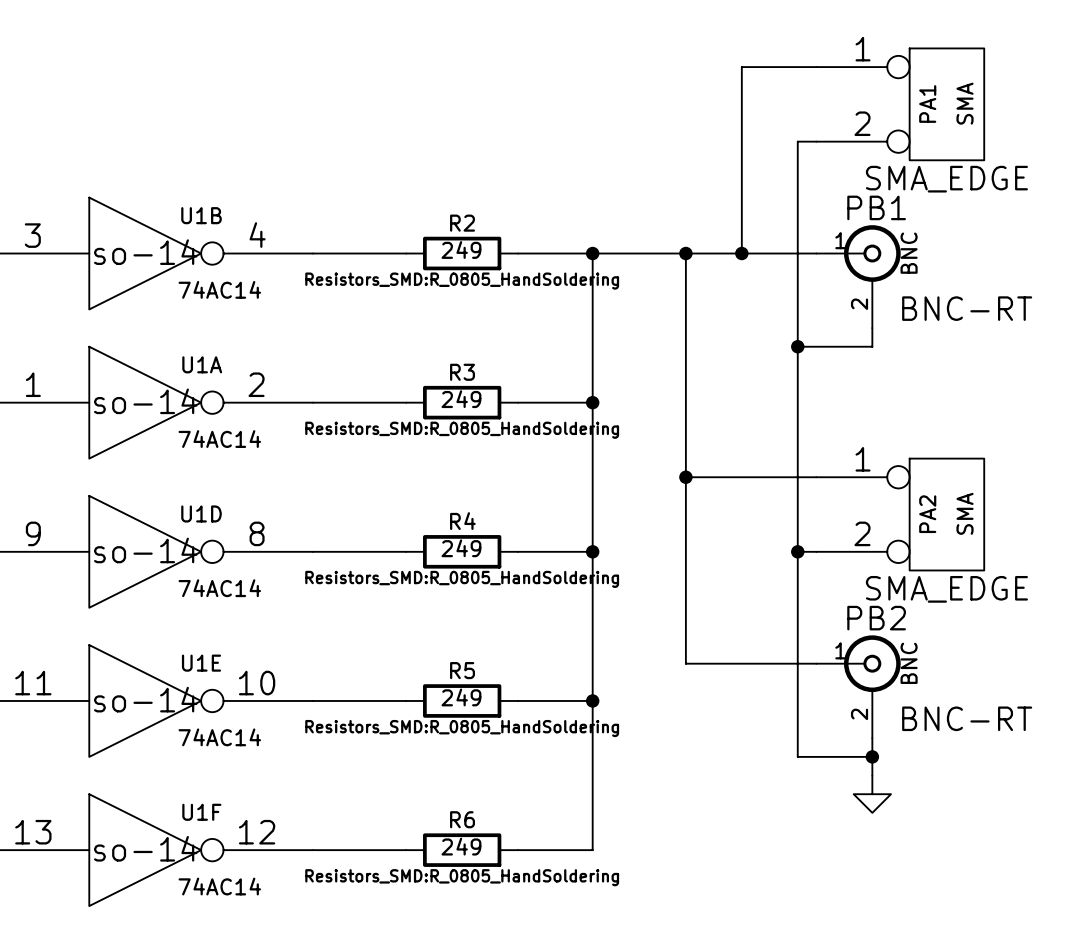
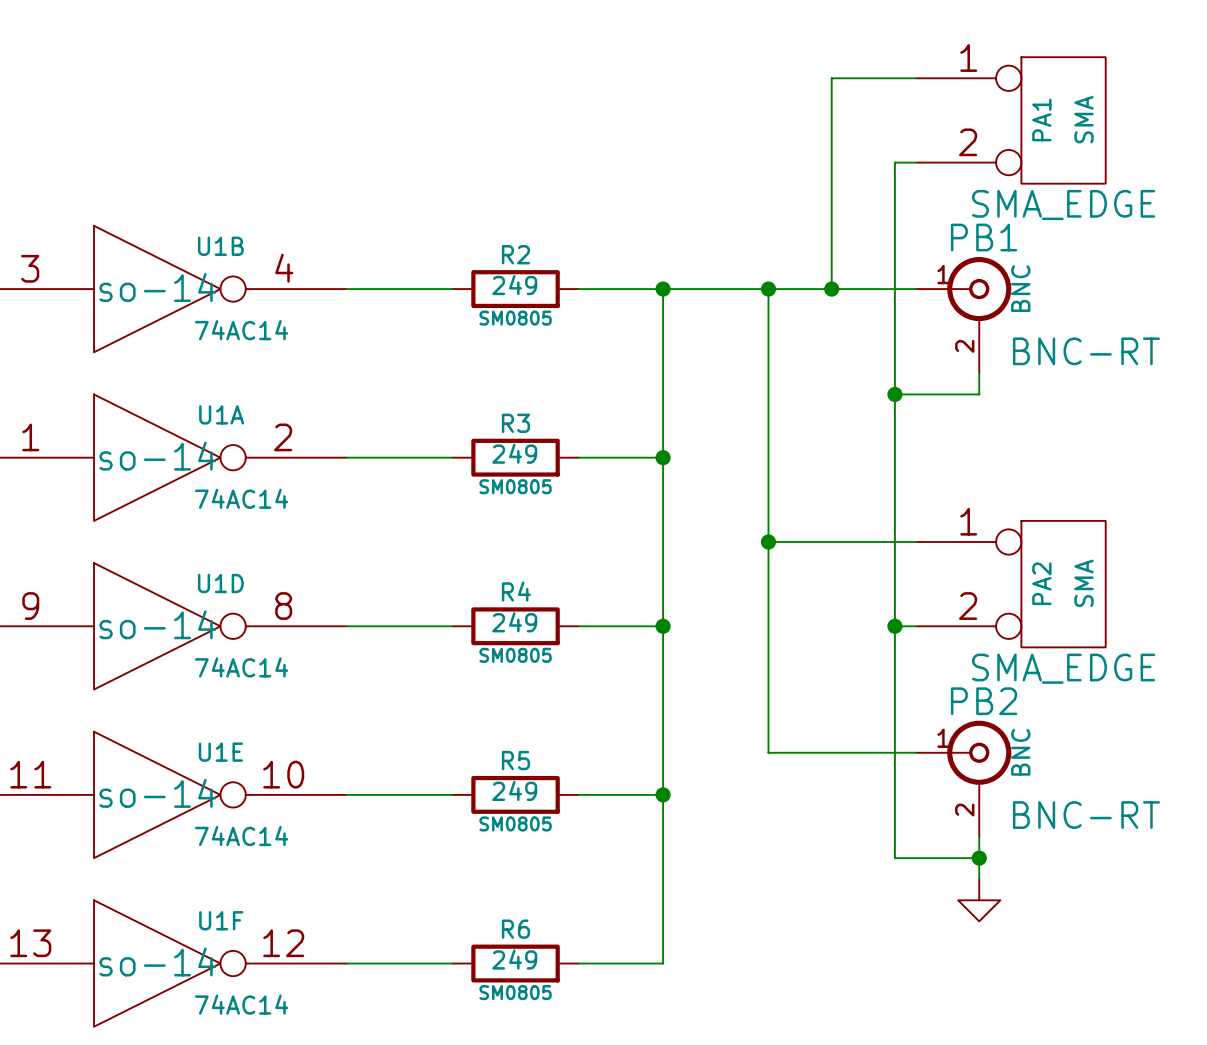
R2 text: Resistors_SMD:R_0805_HandSoldering (462, 281) -> SM0805 (515, 318)
R3 text: Resistors_SMD:R_0805_HandSoldering (462, 430) -> SM0805 (515, 486)
R4 text: Resistors_SMD:R_0805_HandSoldering (462, 579) -> SM0805 (515, 655)
R5 text: Resistors_SMD:R_0805_HandSoldering (462, 728) -> SM0805 (515, 823)
R6 text: Resistors_SMD:R_0805_HandSoldering (462, 877) -> SM0805 (515, 992)

